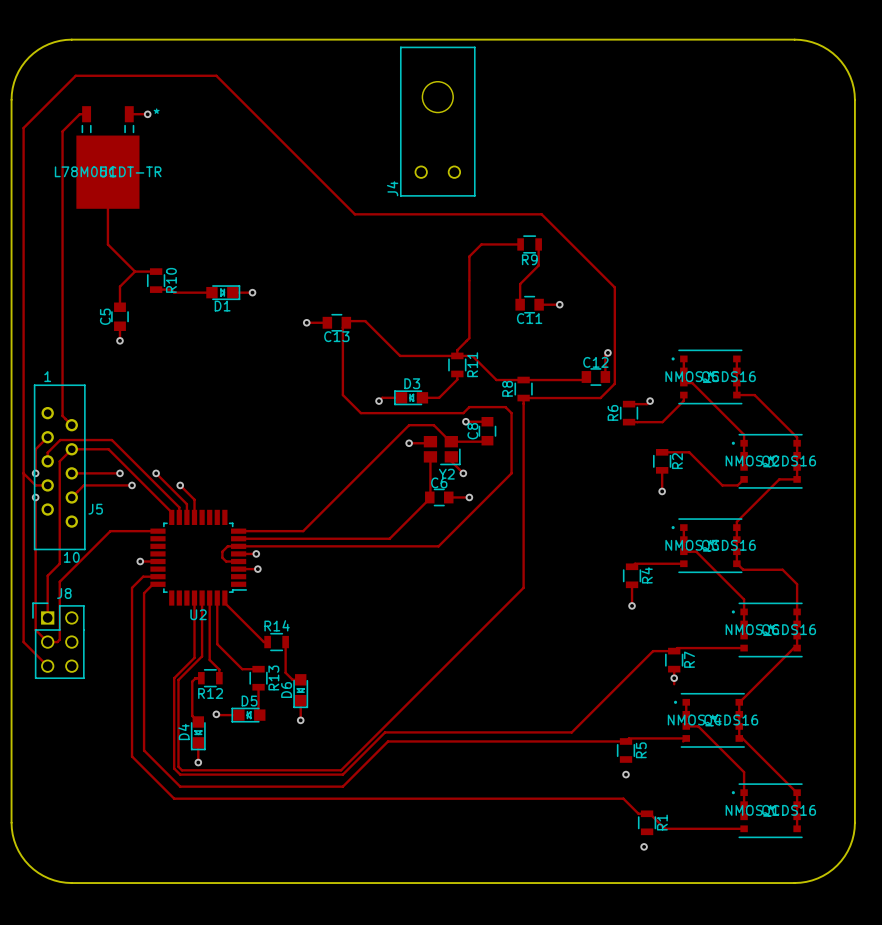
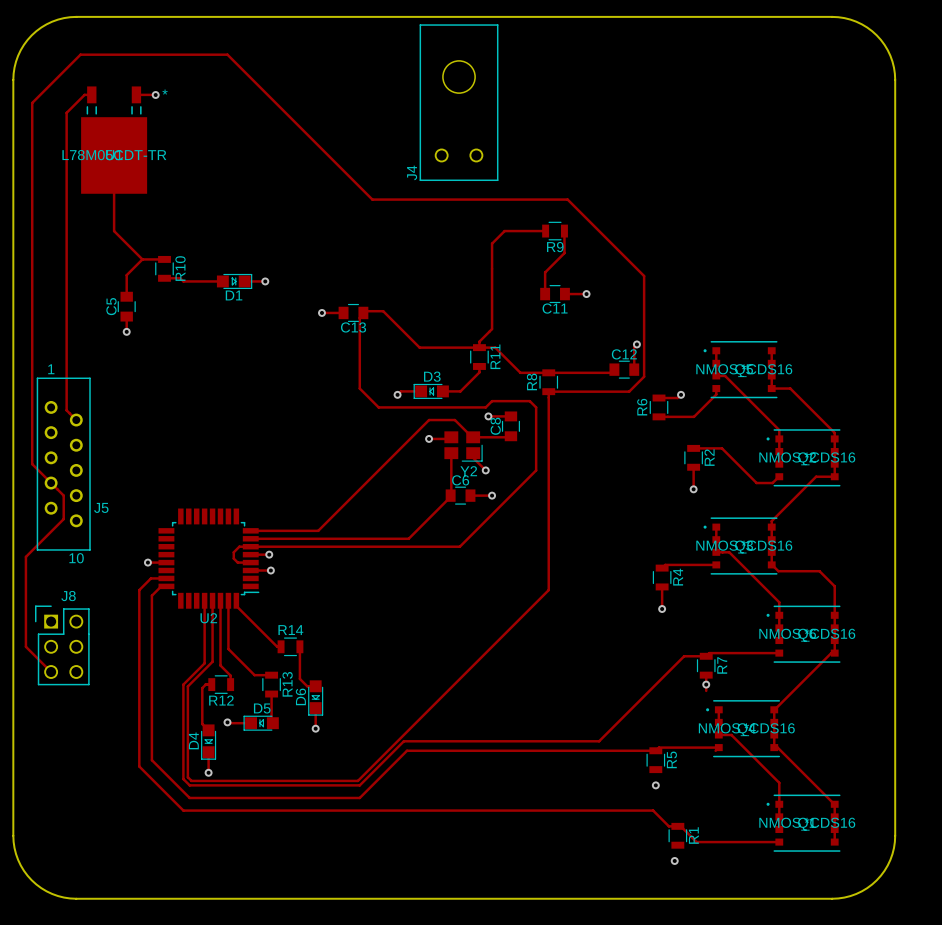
track: (29, 121) (23, 127) (23, 556) -> (32, 102) (32, 464) (63, 495)
track: (47, 437) (35, 449) (35, 473) -> none
track: (47, 461) (47, 452) (60, 440) (111, 440) (179, 507) (179, 517) -> none
track: (23, 473) (35, 485) (47, 485) -> none
via: (35, 473) -> none
track: (71, 473) (119, 473) -> none
via: (119, 473) -> none
track: (156, 473) (186, 504) (186, 517) -> none
via: (156, 473) -> none
track: (132, 485) (83, 485) (71, 497) -> none
via: (132, 485) -> none
track: (180, 485) (194, 499) (194, 517) -> none
via: (180, 485) -> none
track: (35, 497) (35, 630) (47, 642) (57, 642) (59, 639) (59, 581) (110, 531) (157, 531) -> none
via: (35, 497) -> none
track: (59, 497) (59, 461) (71, 449) (108, 449) (171, 512) (171, 517) -> none
track: (59, 519) (59, 563) (47, 575) (47, 617) -> (63, 519) (25, 556)

